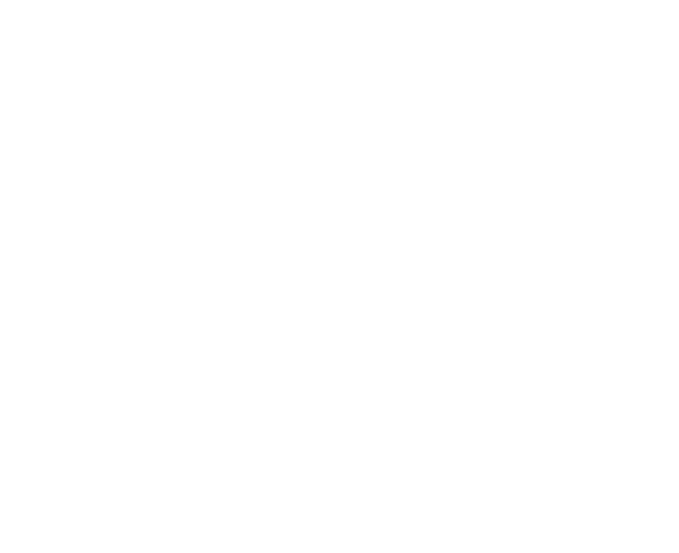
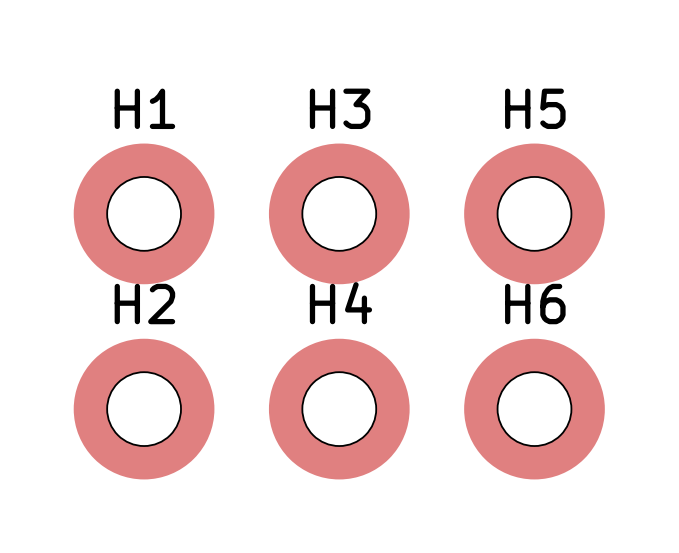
H1: none -> (144, 213)
H3: none -> (339, 213)
H5: none -> (534, 213)
H2: none -> (144, 409)
H4: none -> (339, 409)
H6: none -> (534, 409)

